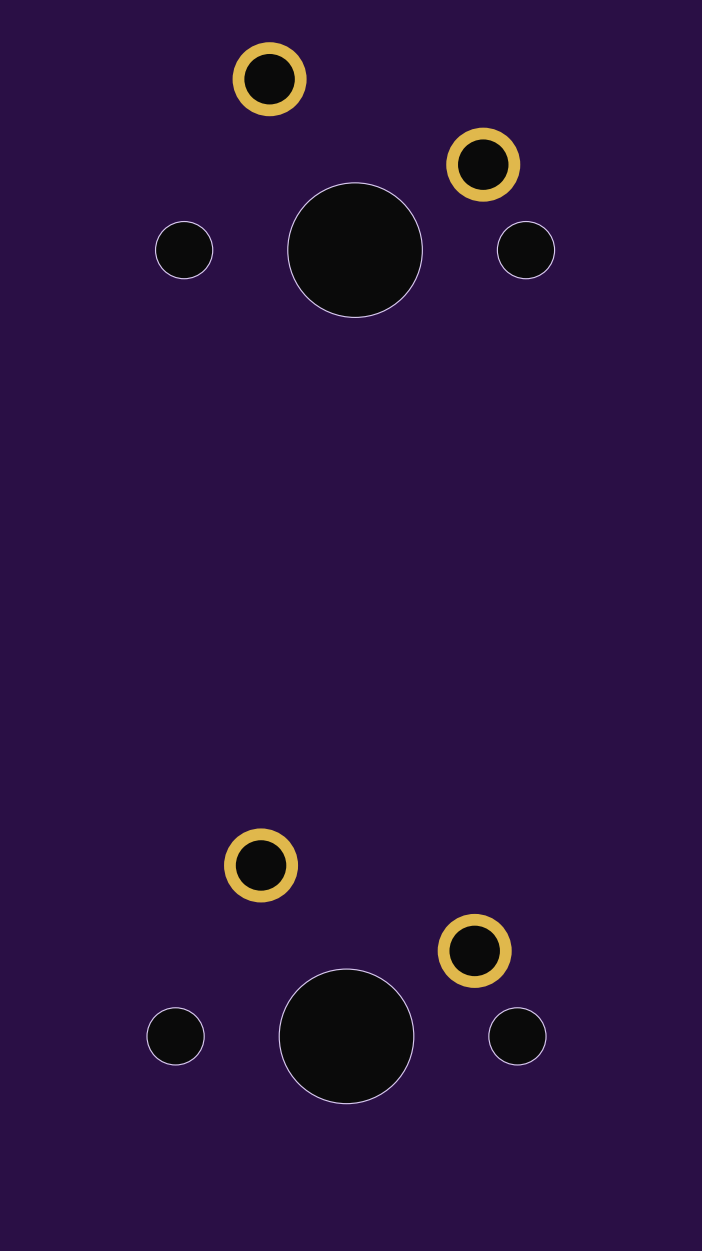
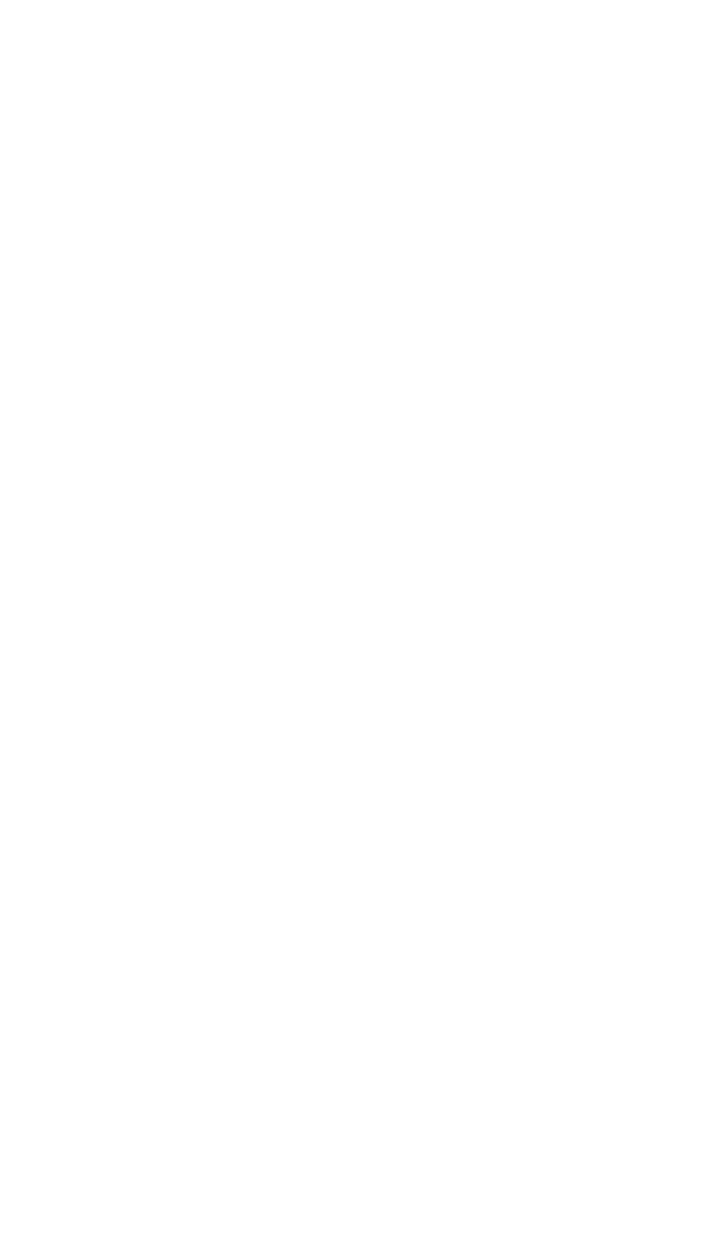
part: (355, 179) -> none
part: (346, 966) -> none

